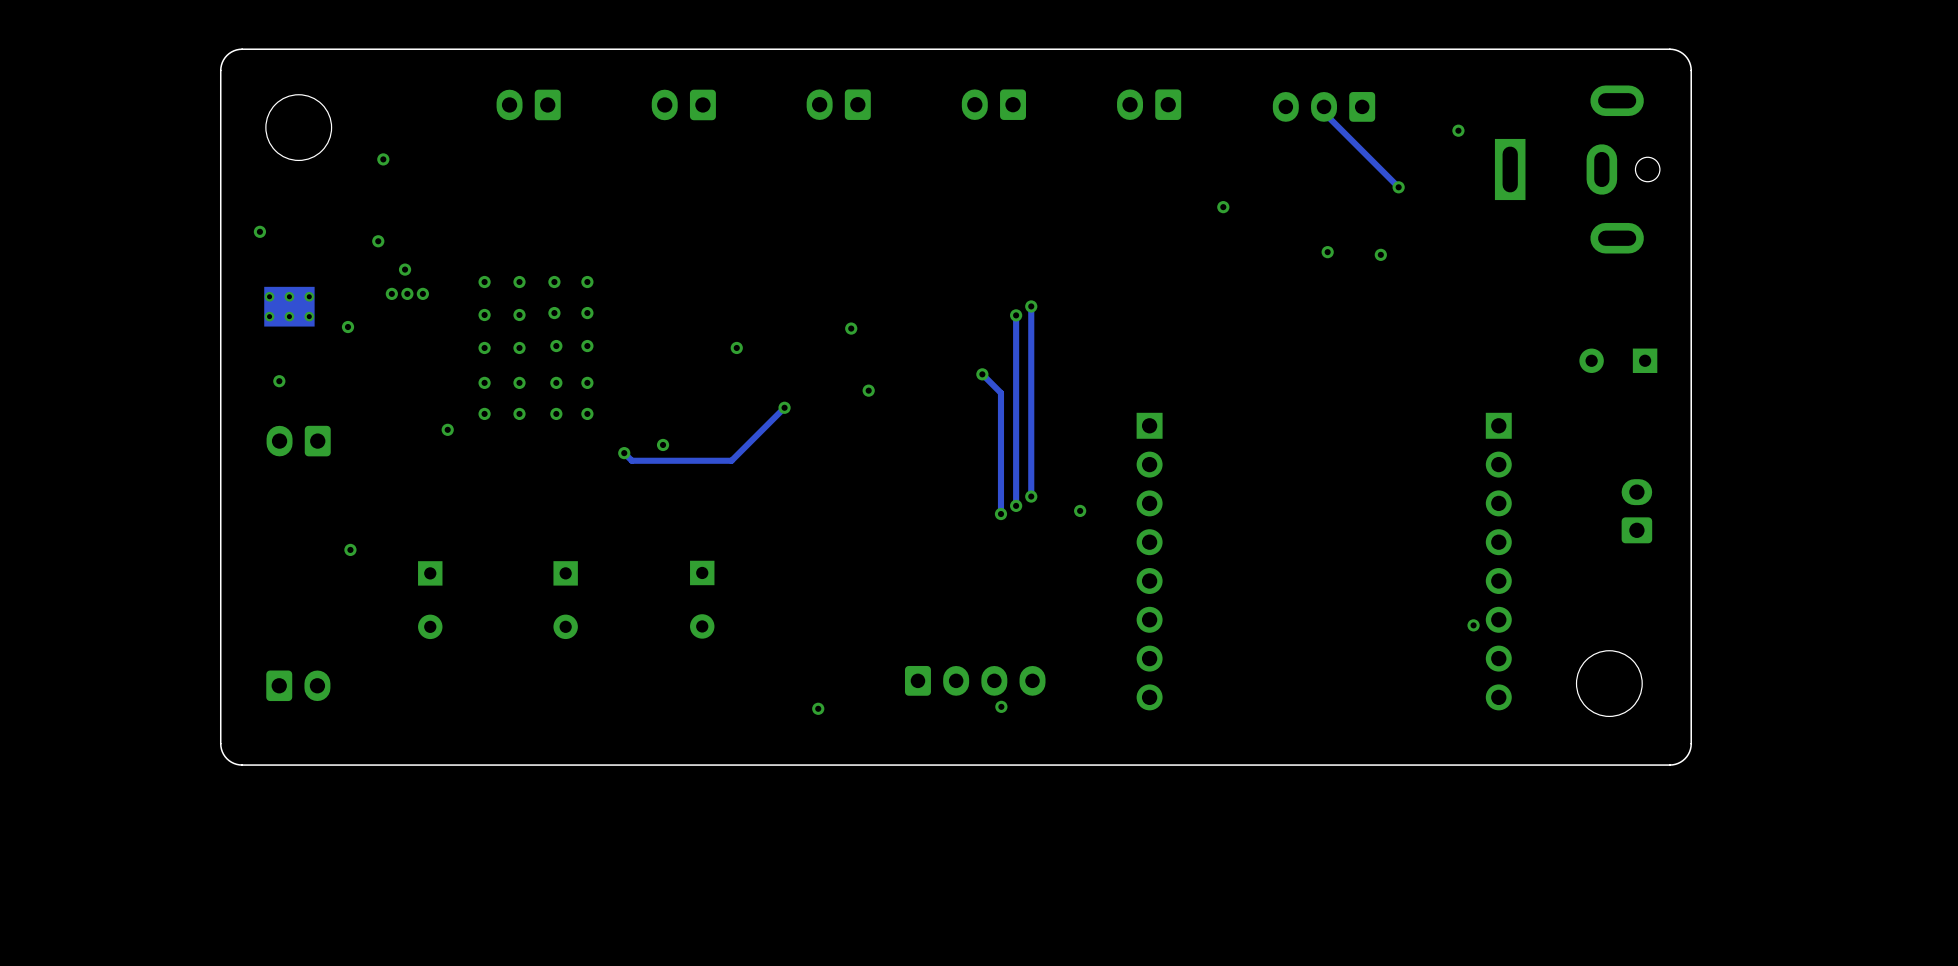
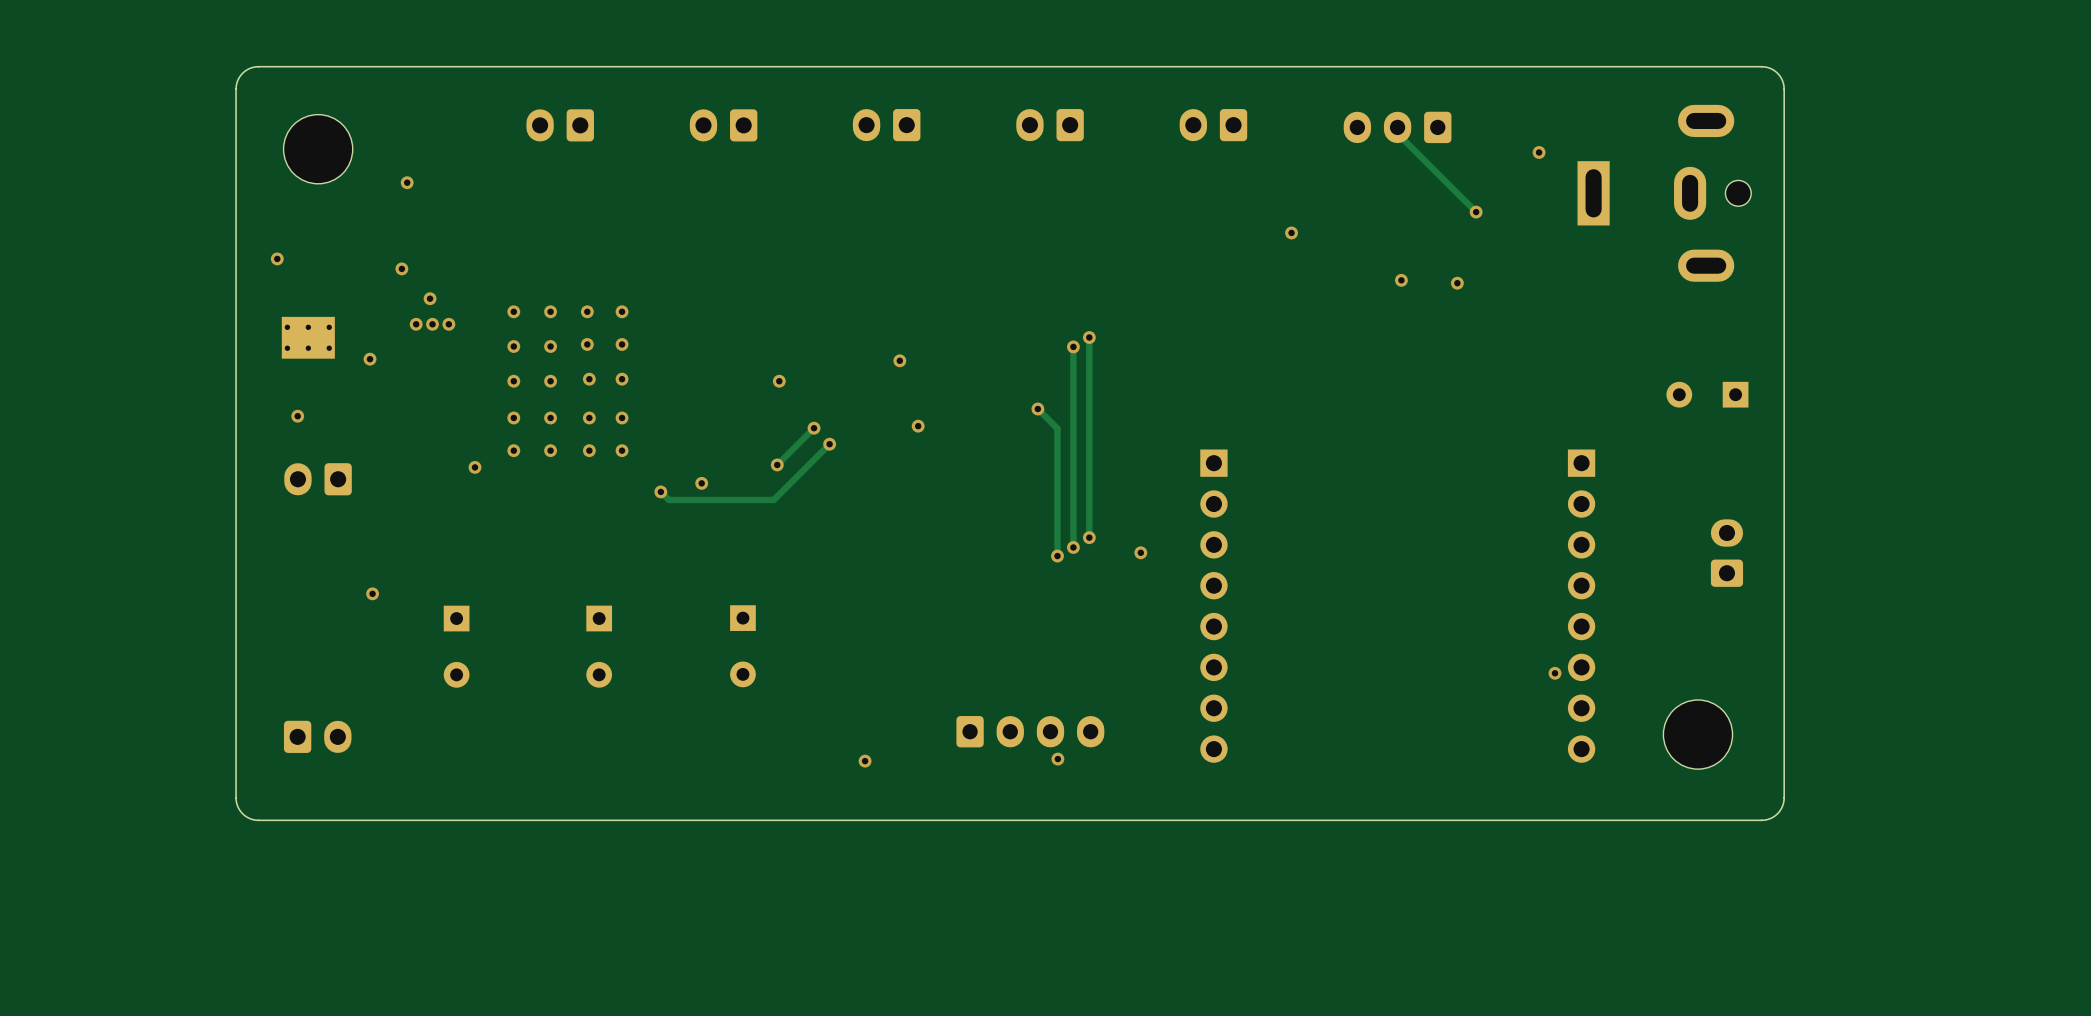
track: none -> (814, 428) (777, 464)
via: none -> (814, 428)
via: none -> (777, 464)

